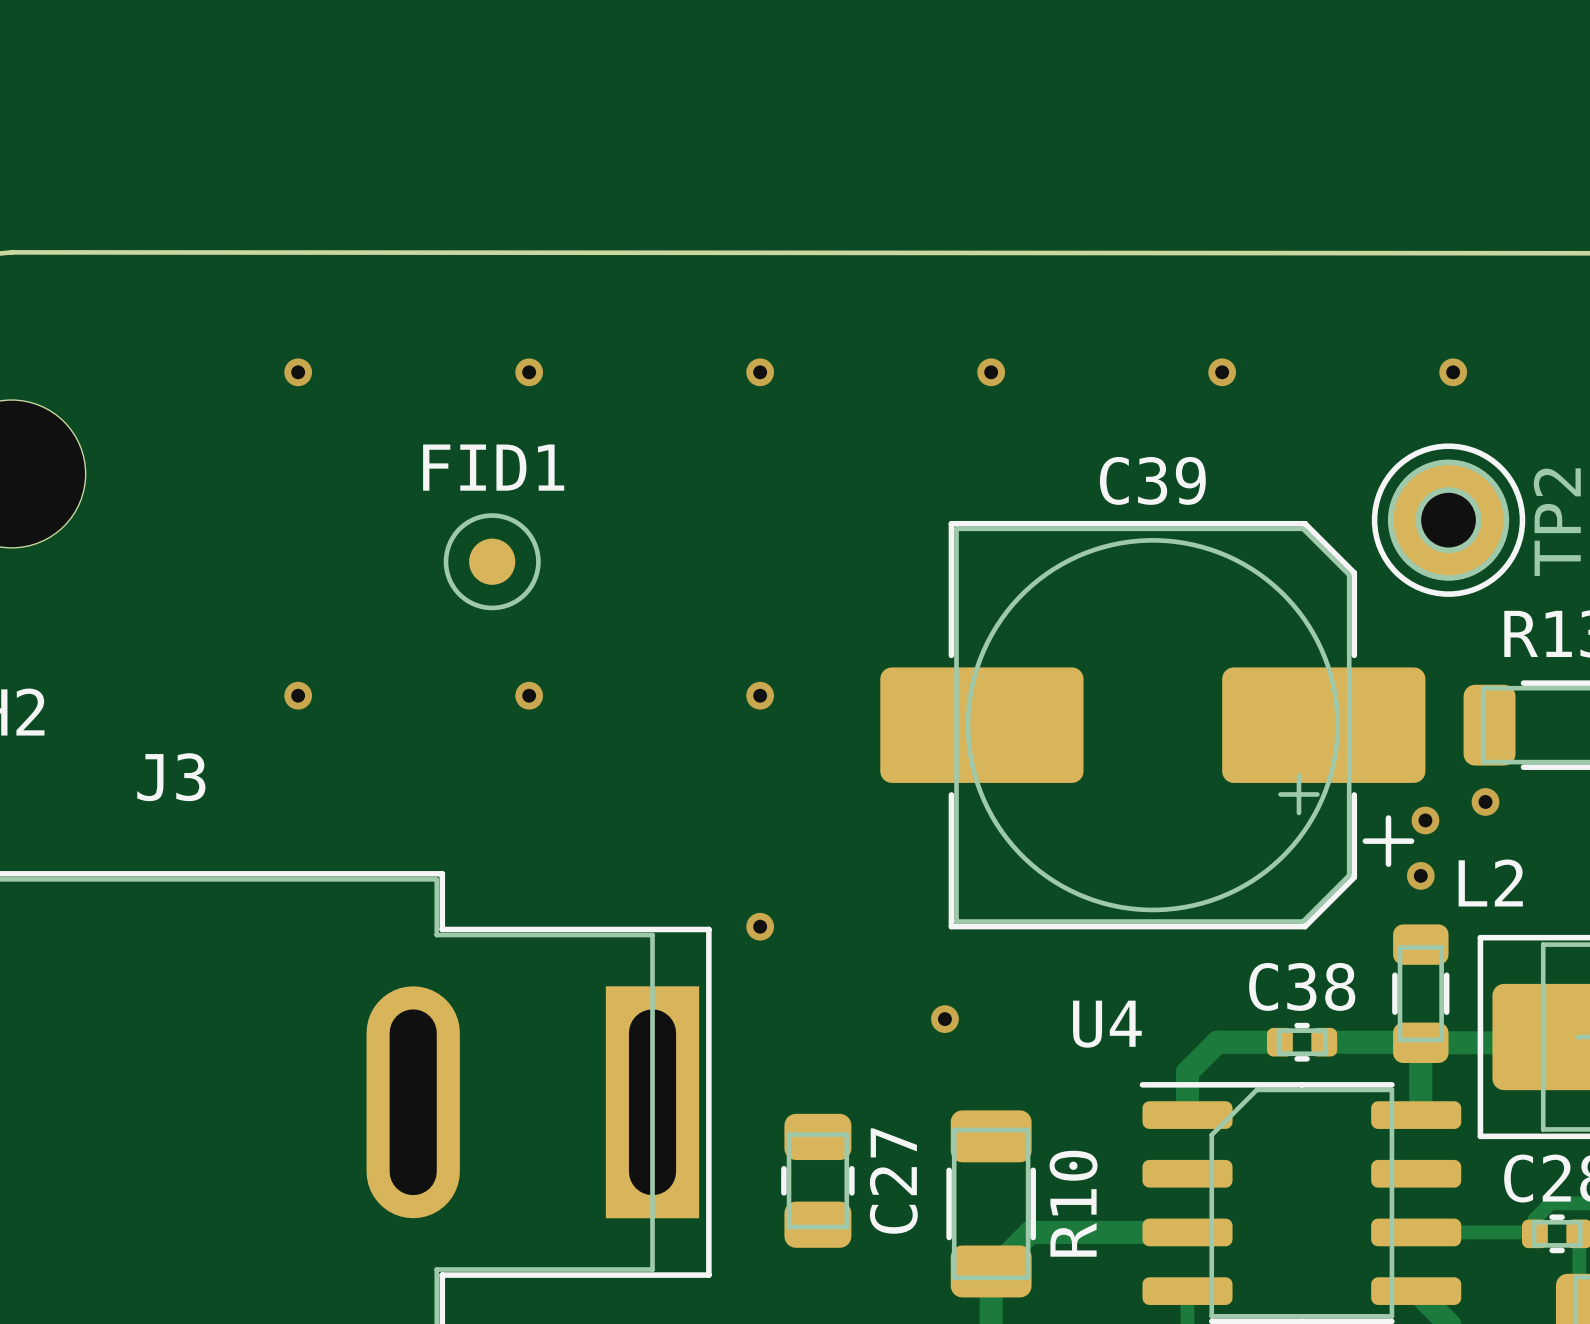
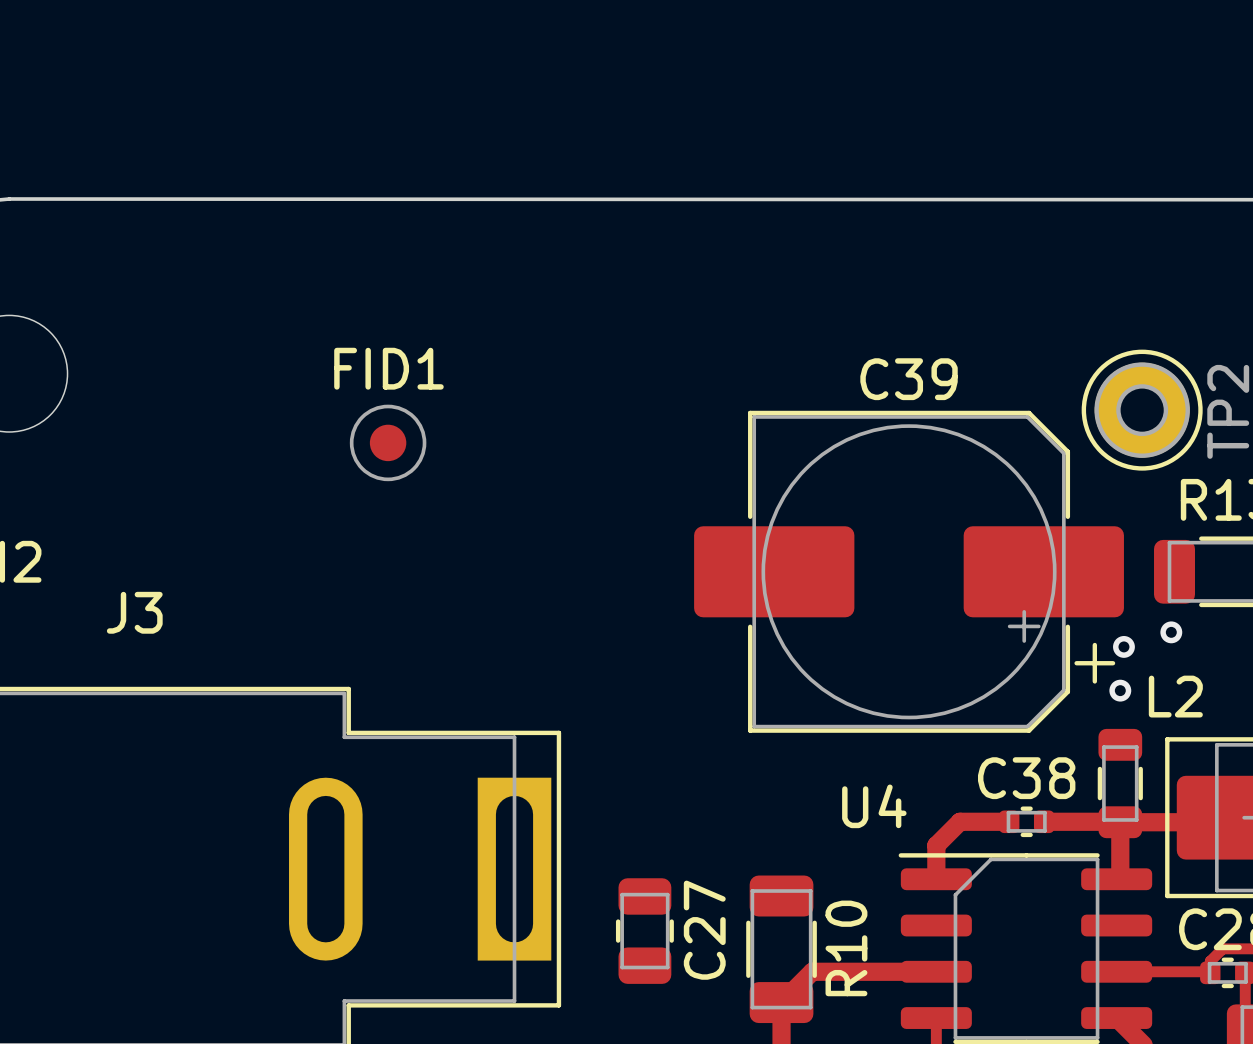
via: (298, 372) -> none
via: (529, 372) -> none
via: (760, 372) -> none
via: (991, 372) -> none
via: (1222, 372) -> none
via: (1453, 372) -> none
via: (298, 695) -> none
via: (529, 695) -> none
via: (760, 695) -> none
via: (760, 926) -> none
via: (944, 1019) -> none

